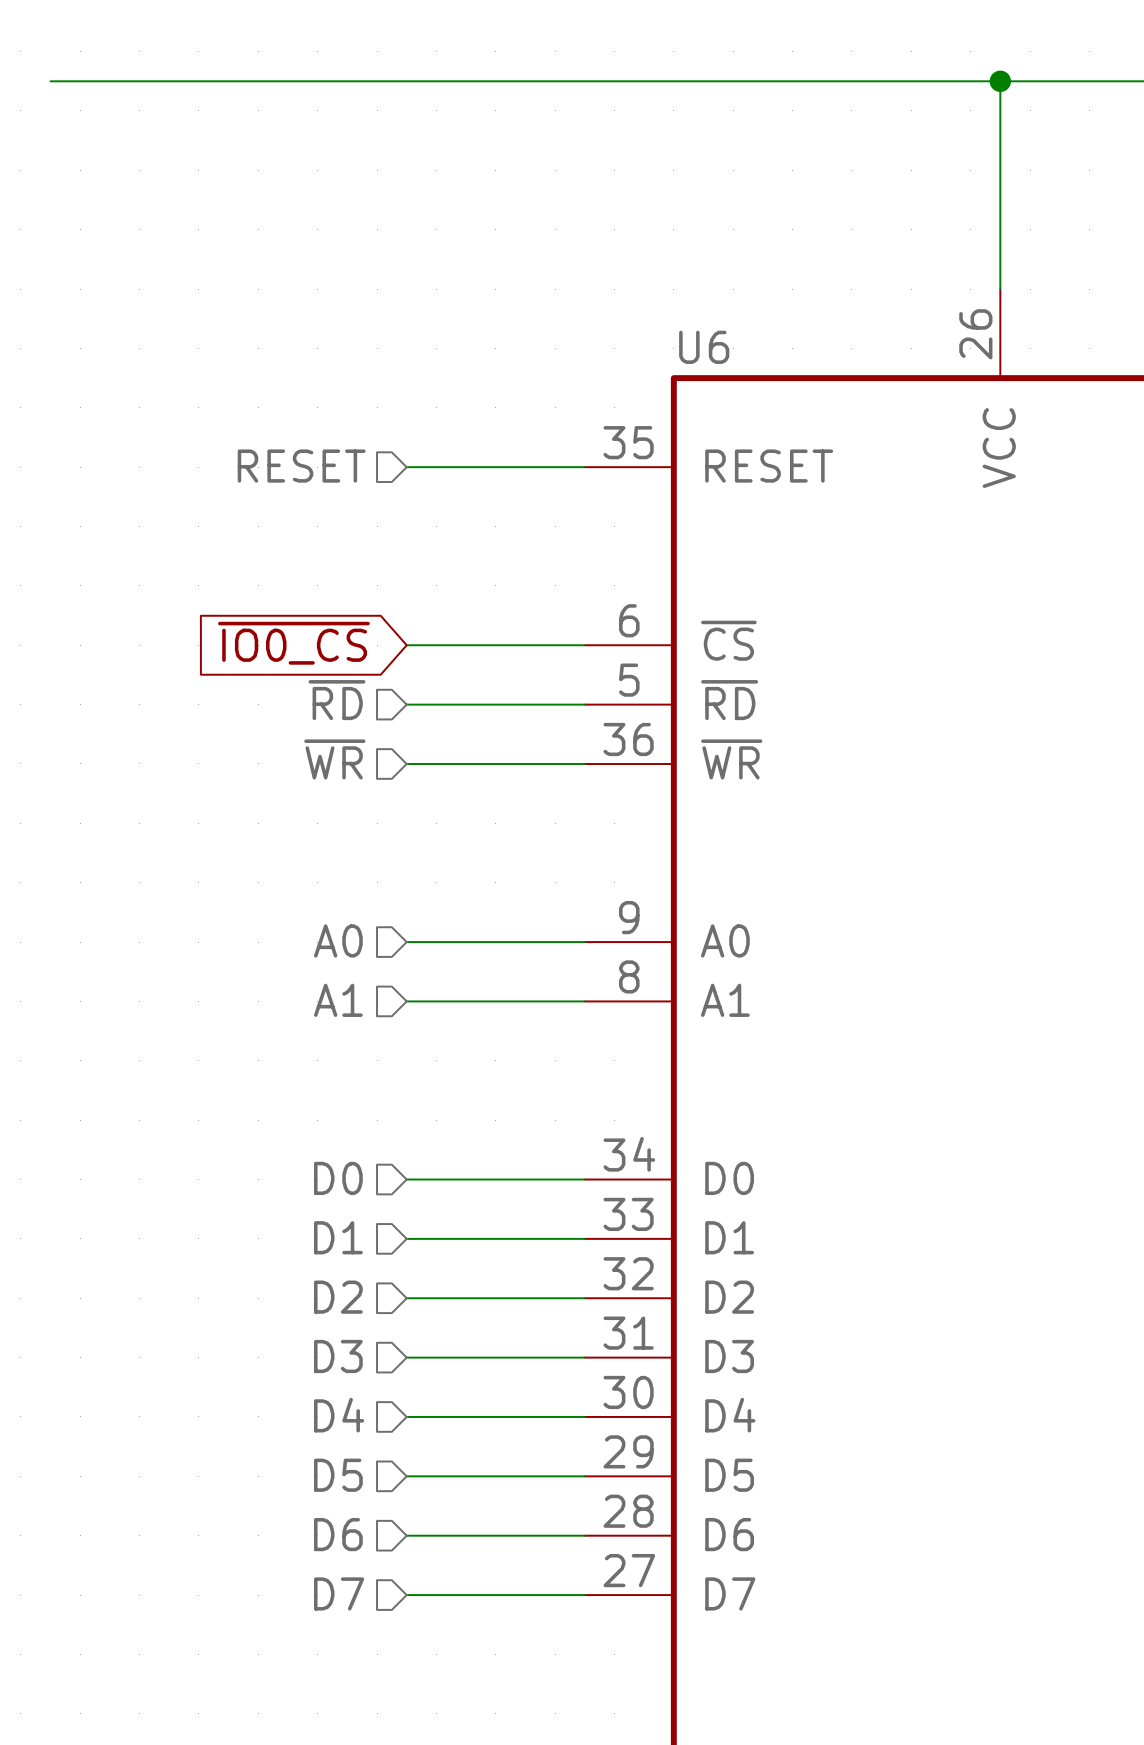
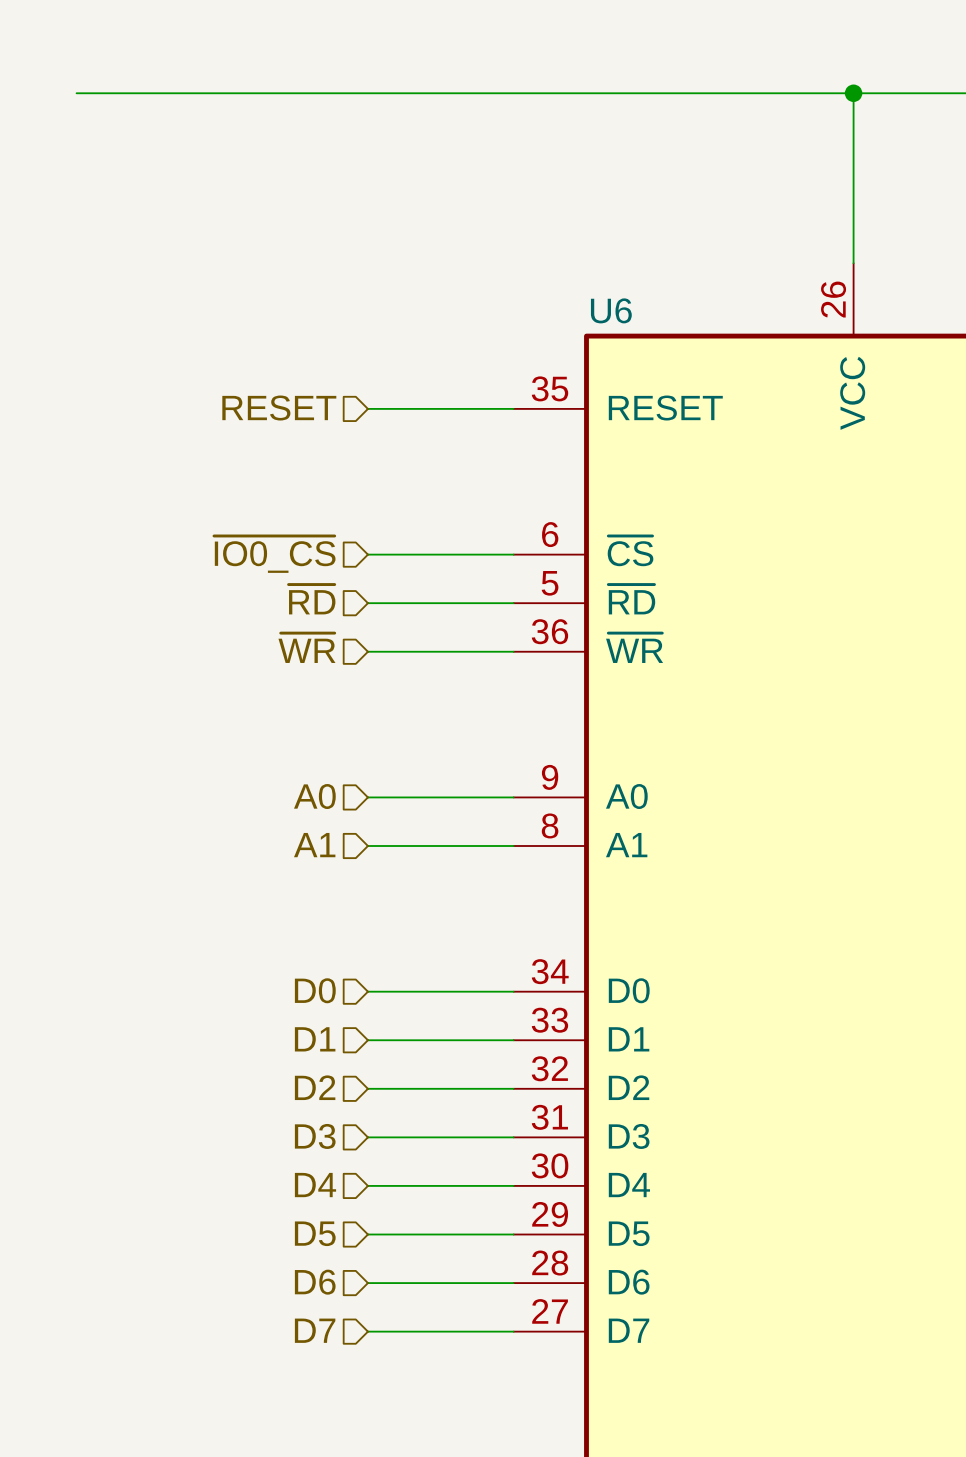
hierarchical label: none -> ~{IO0_CS} (274, 554)
global label: ~{IO0_CS} (293, 643) -> none

